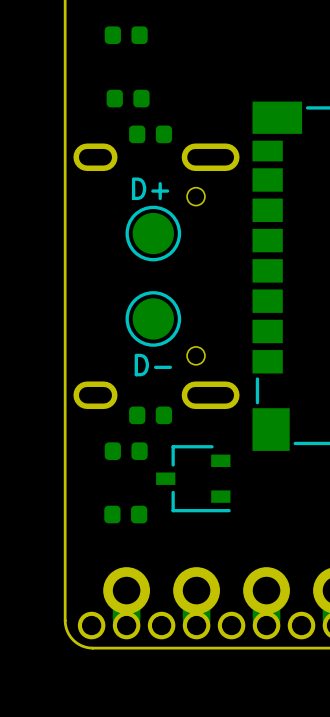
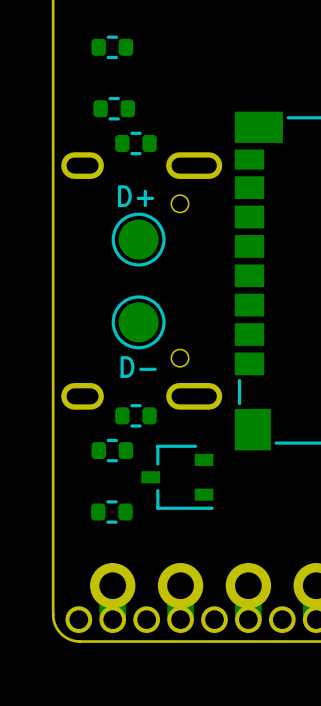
part footprint: [104, 26, 148, 45] -> [91, 35, 134, 60]
part footprint: [106, 89, 150, 108] -> [93, 96, 136, 121]
part footprint: [129, 125, 173, 144] -> [115, 131, 157, 156]
part footprint: [129, 406, 173, 425] -> [115, 404, 157, 428]
part footprint: [104, 442, 148, 460] -> [91, 438, 134, 463]
part footprint: [104, 505, 148, 524] -> [91, 500, 133, 524]

